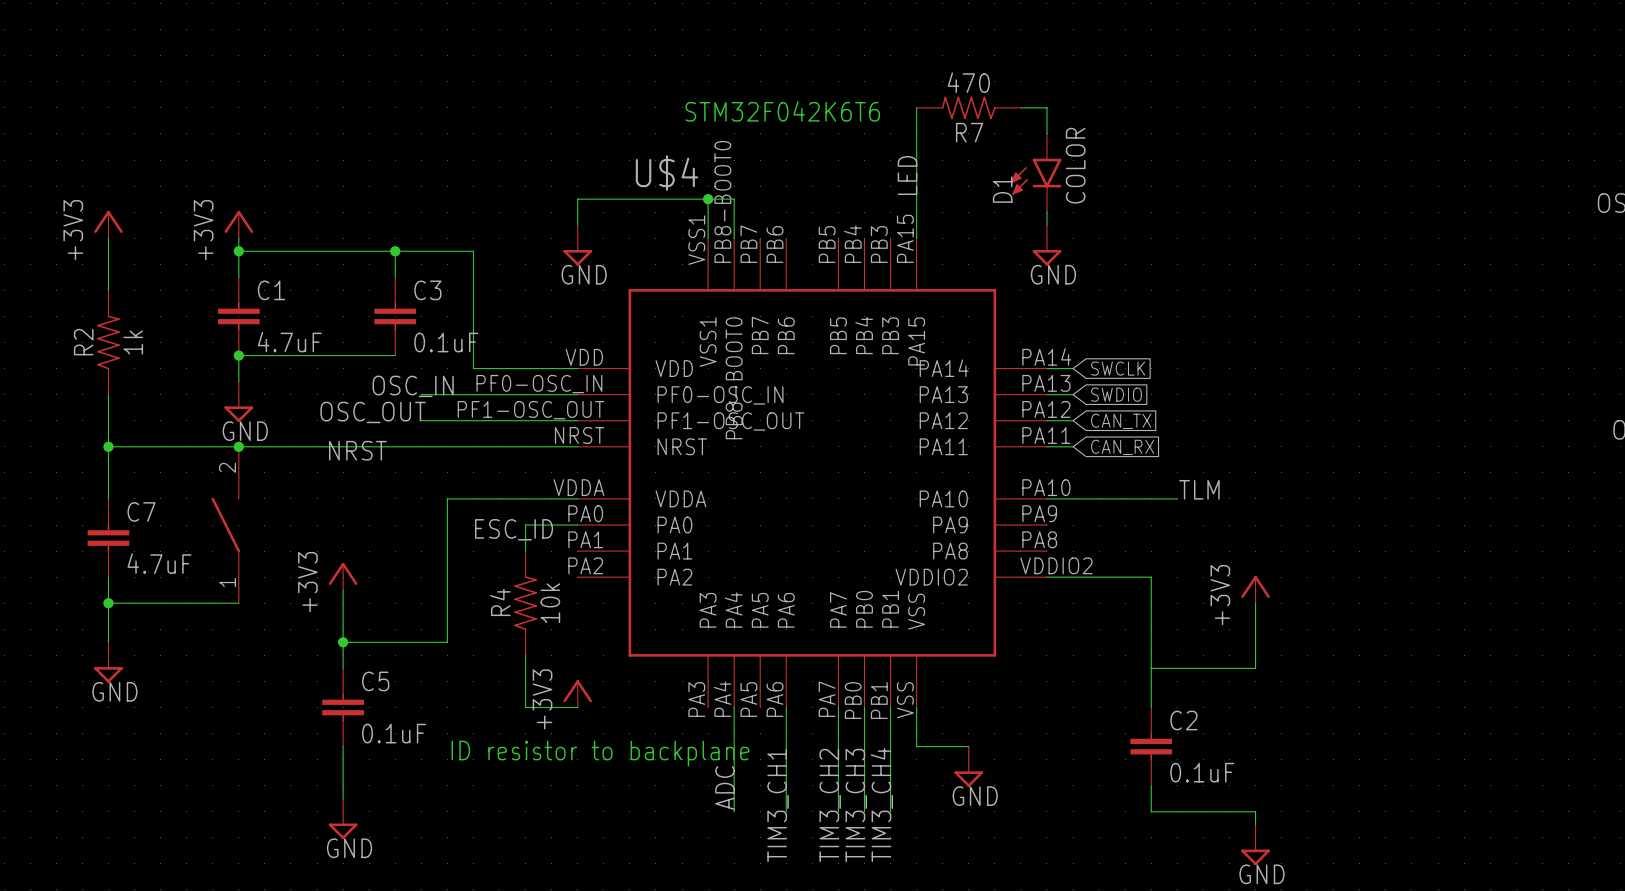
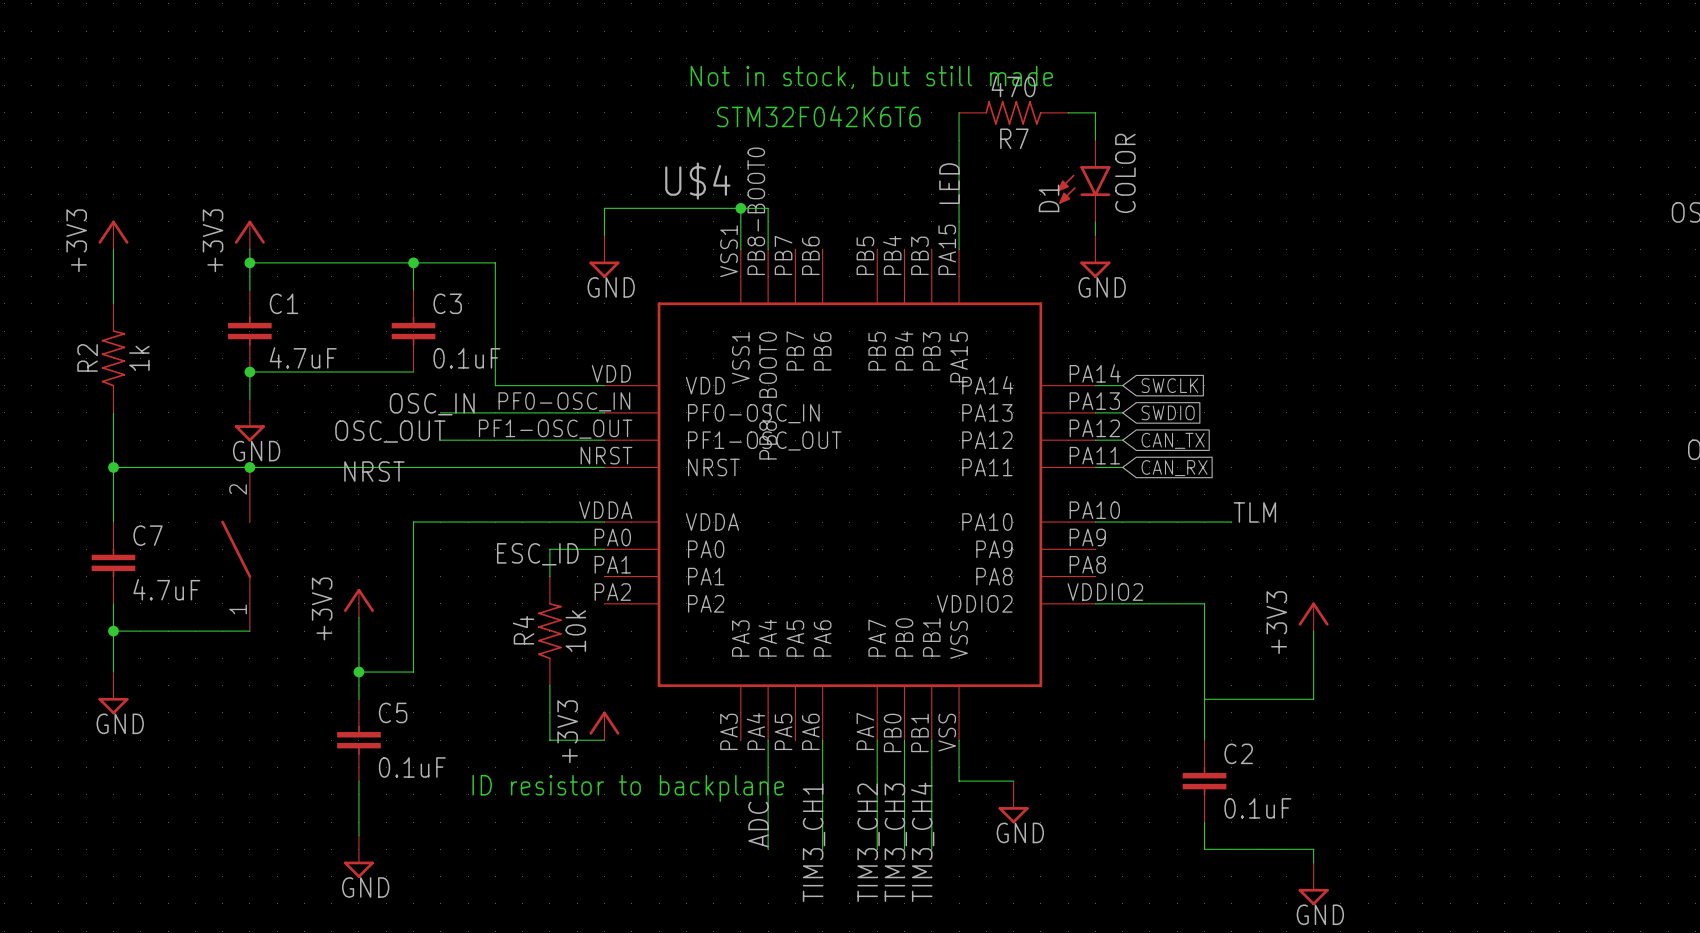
text: none -> Not in stock, but still made (871, 77)
wire: (447, 498) (447, 642) (395, 642) -> (468, 522) (413, 522) (413, 672)

